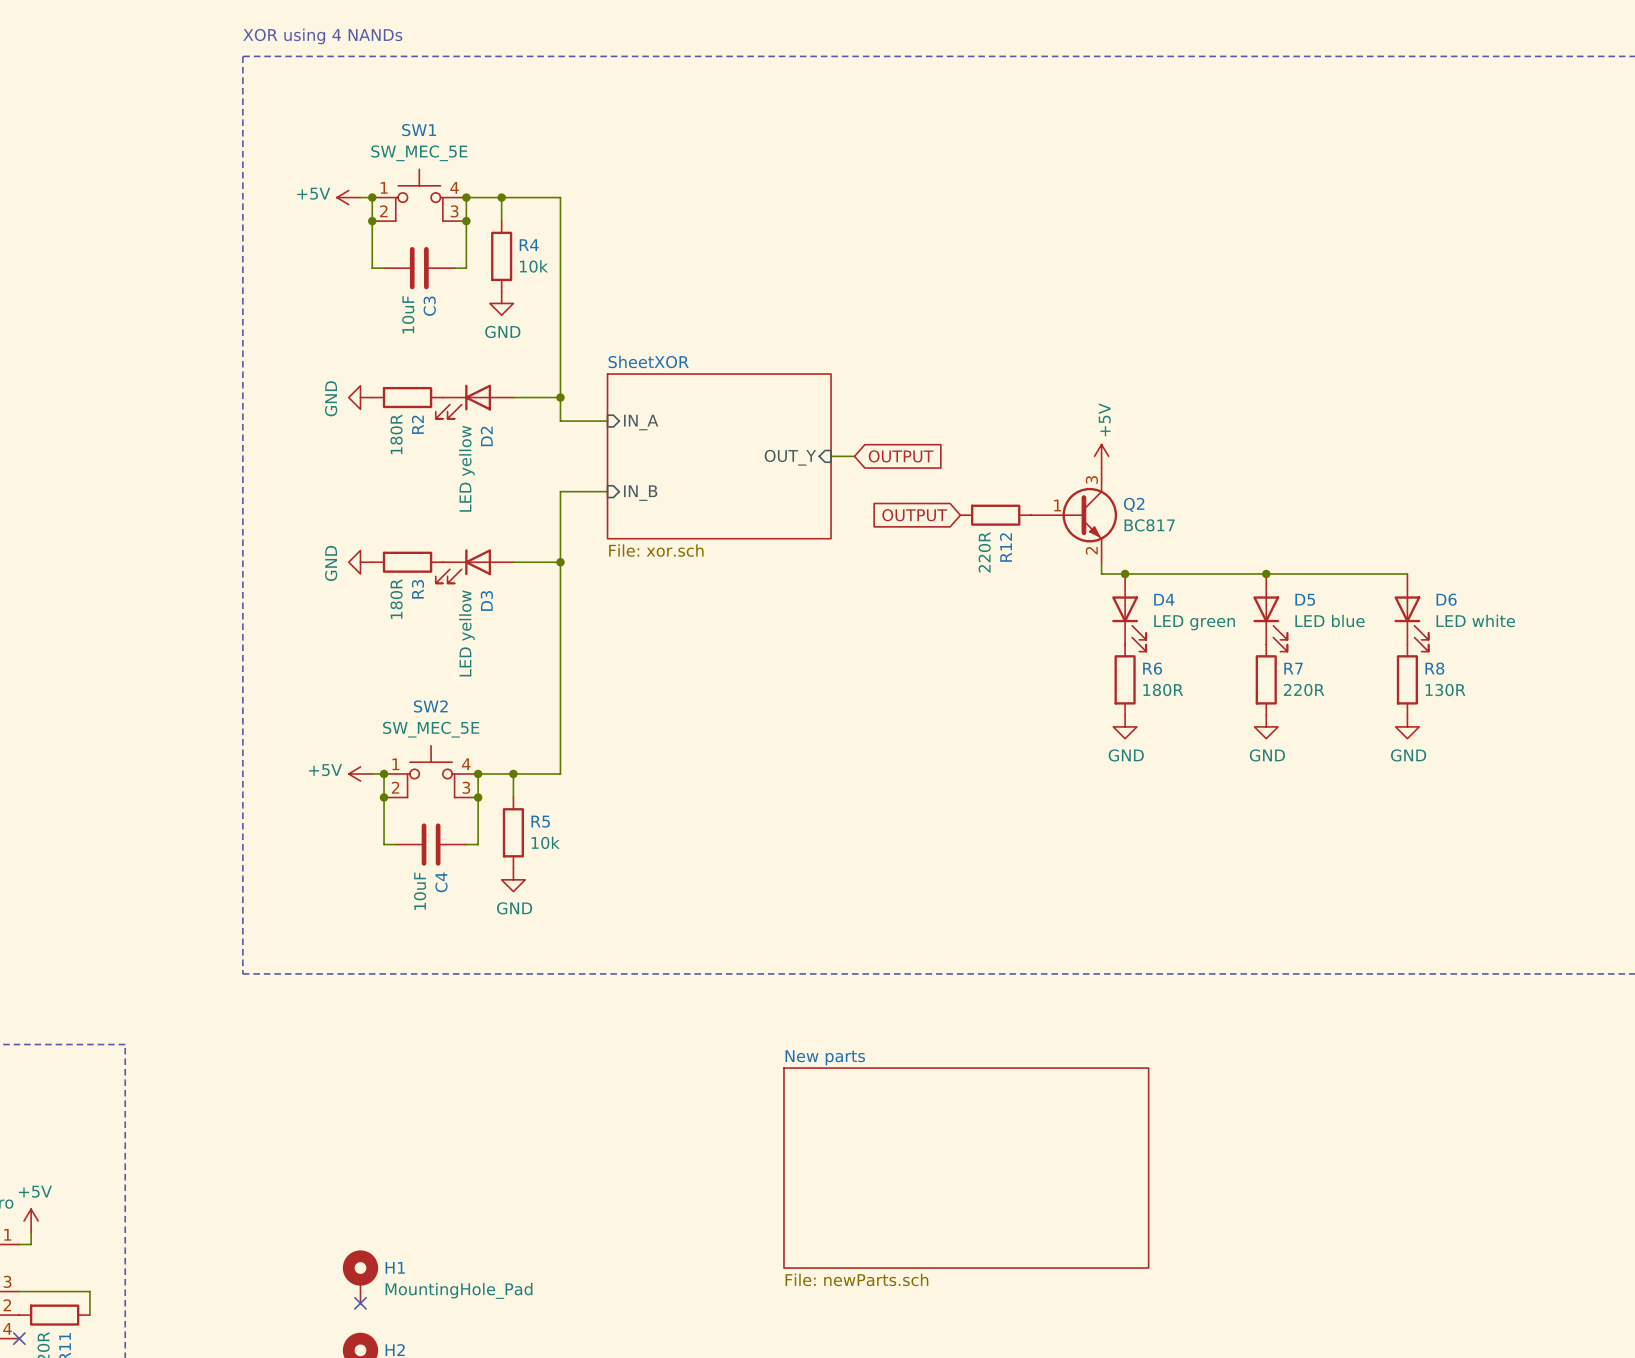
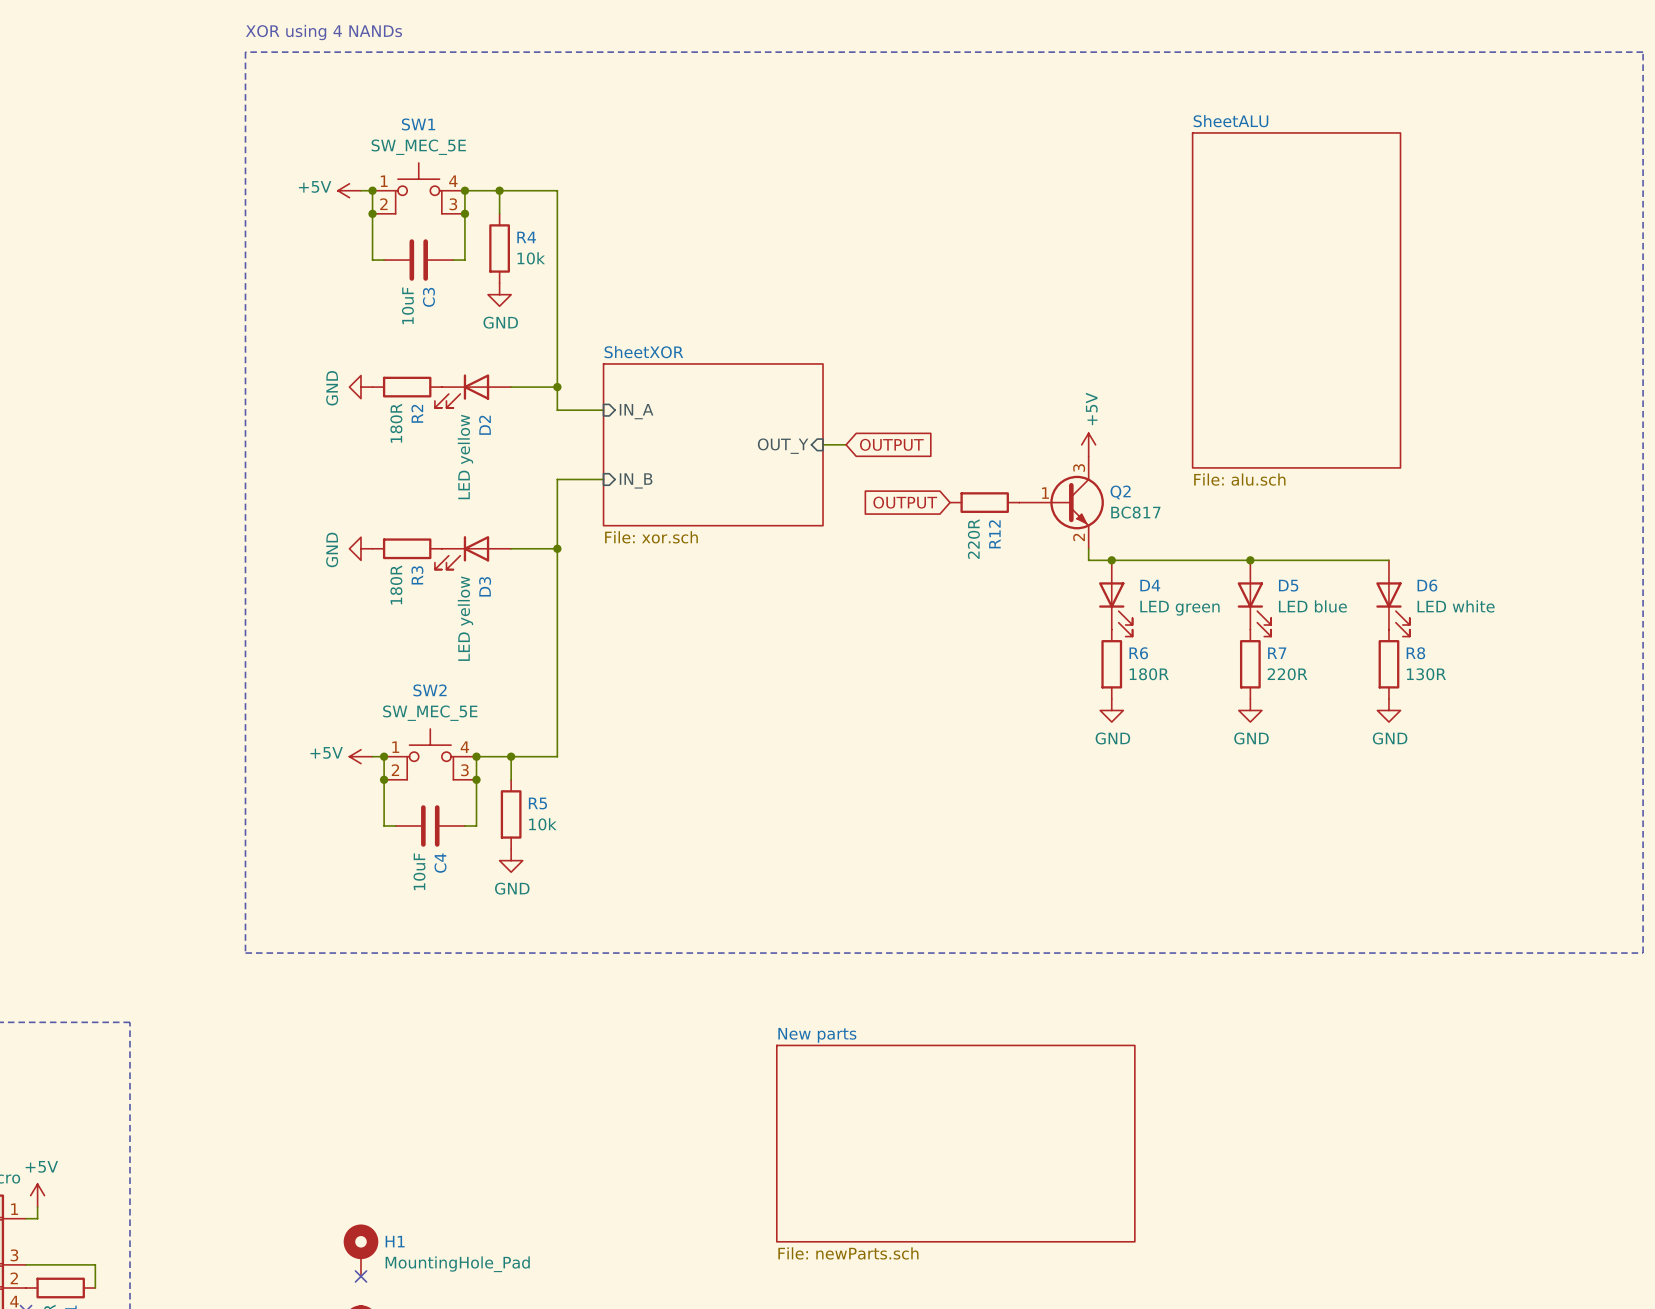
sheet SheetALU: none -> File: alu.sch (1296, 300)

